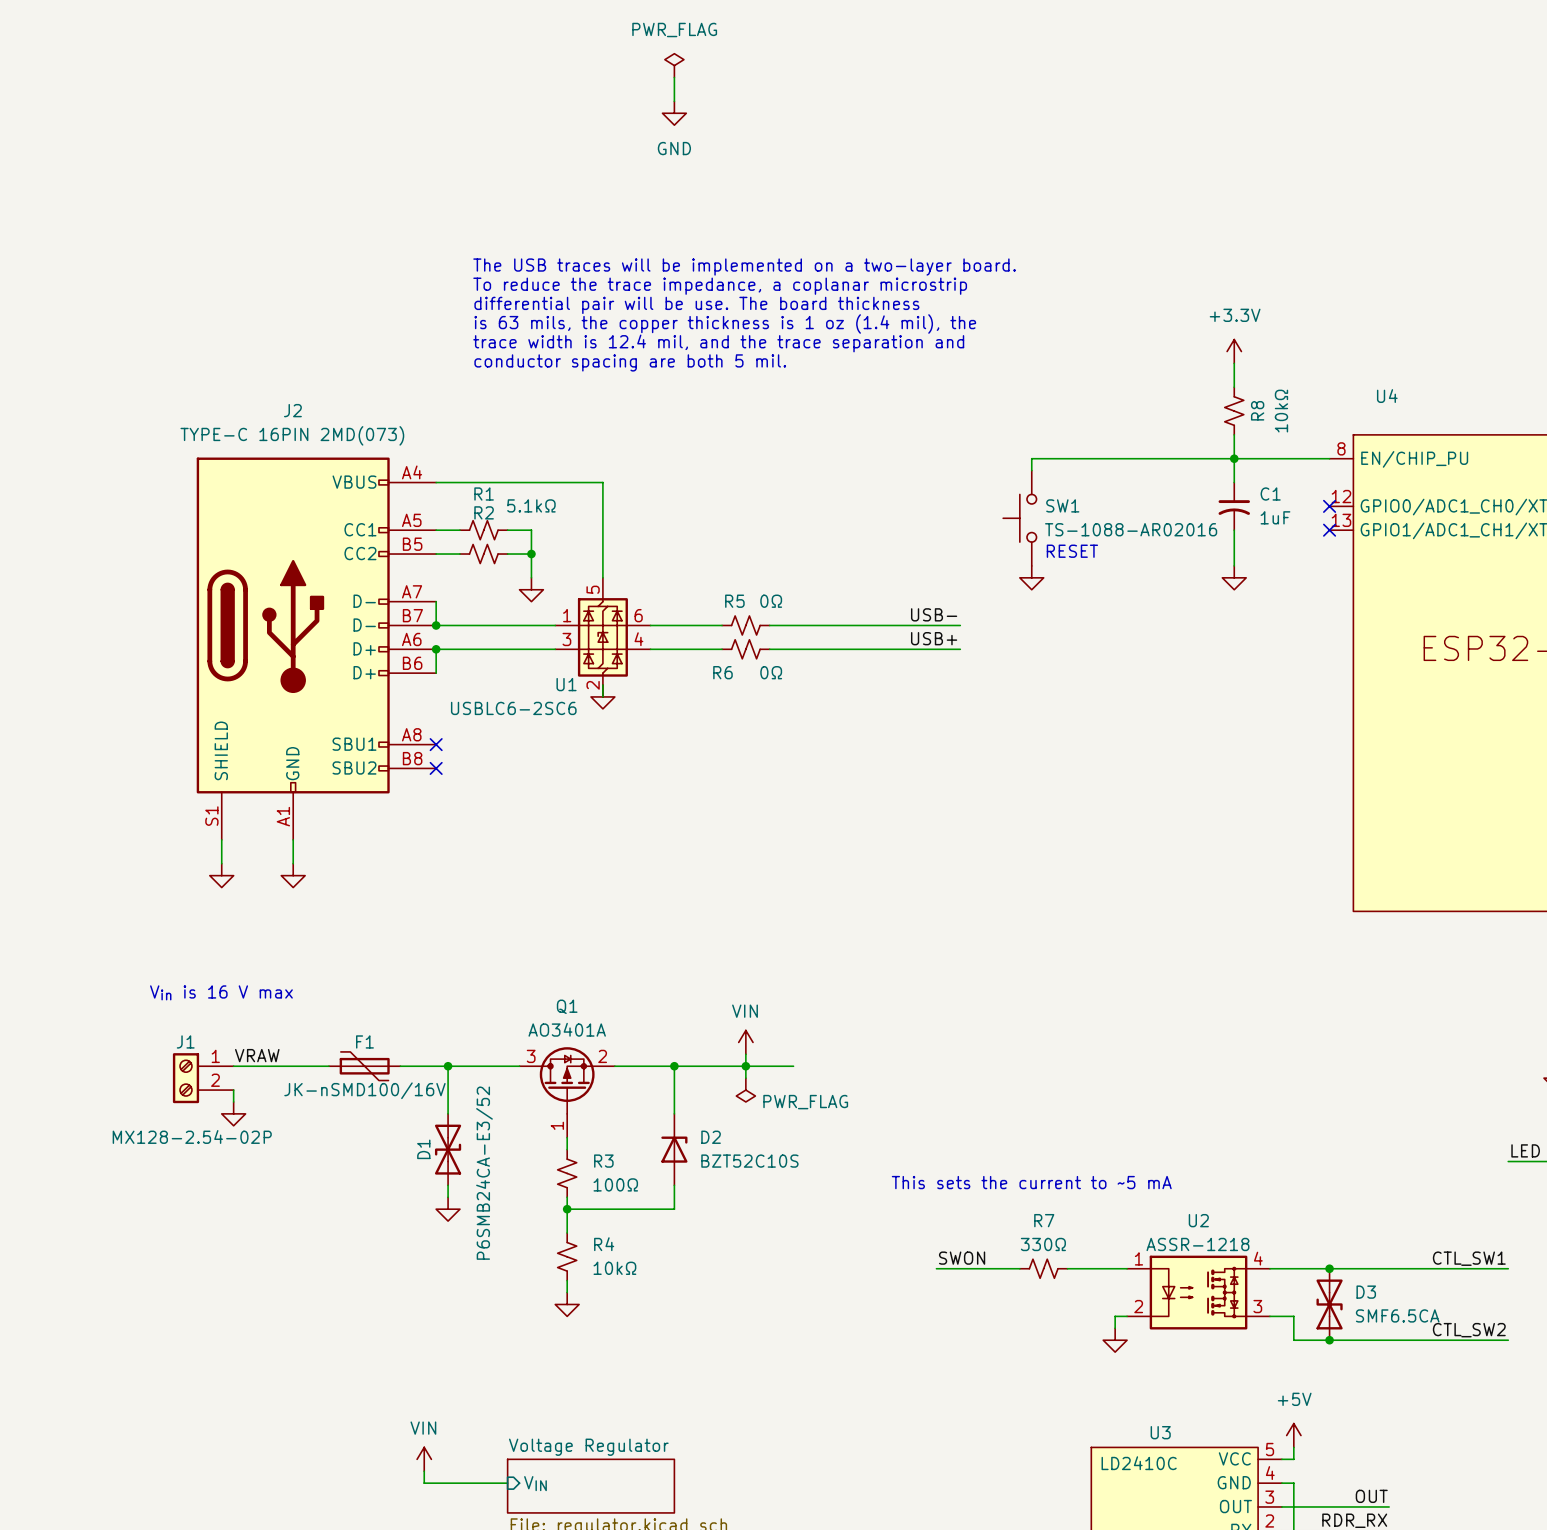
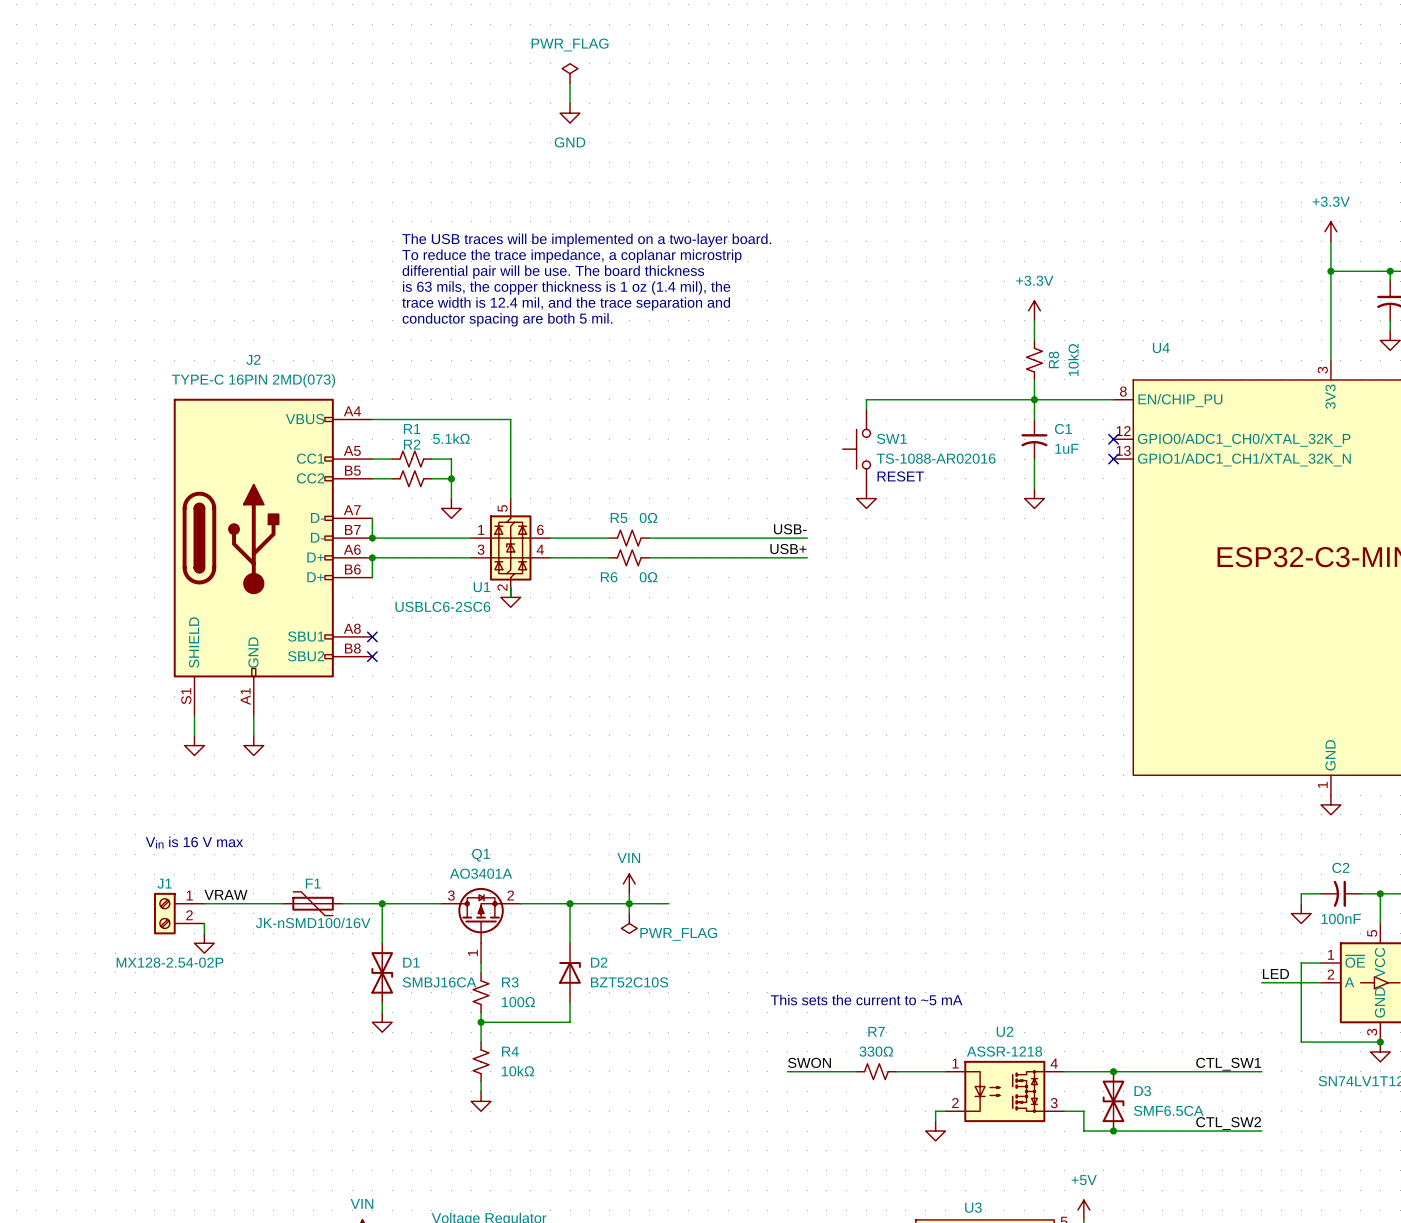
D1 name position: D1 (423, 1149) -> D1 (411, 962)
D1 flip: as is (448, 1149) -> left-right (382, 972)
D1 value: P6SMB24CA-E3/52 (484, 1173) -> SMBJ16CA (439, 982)

